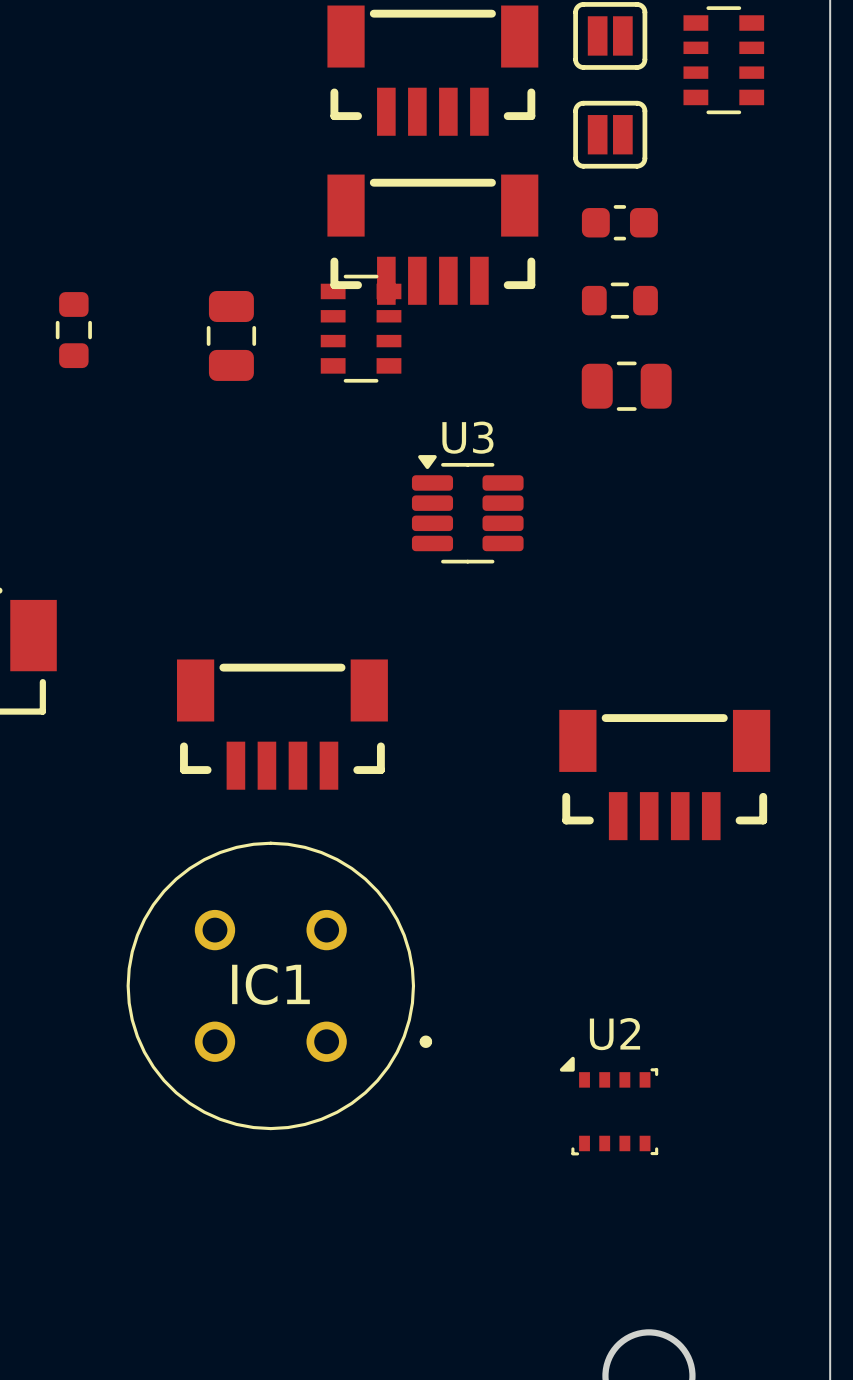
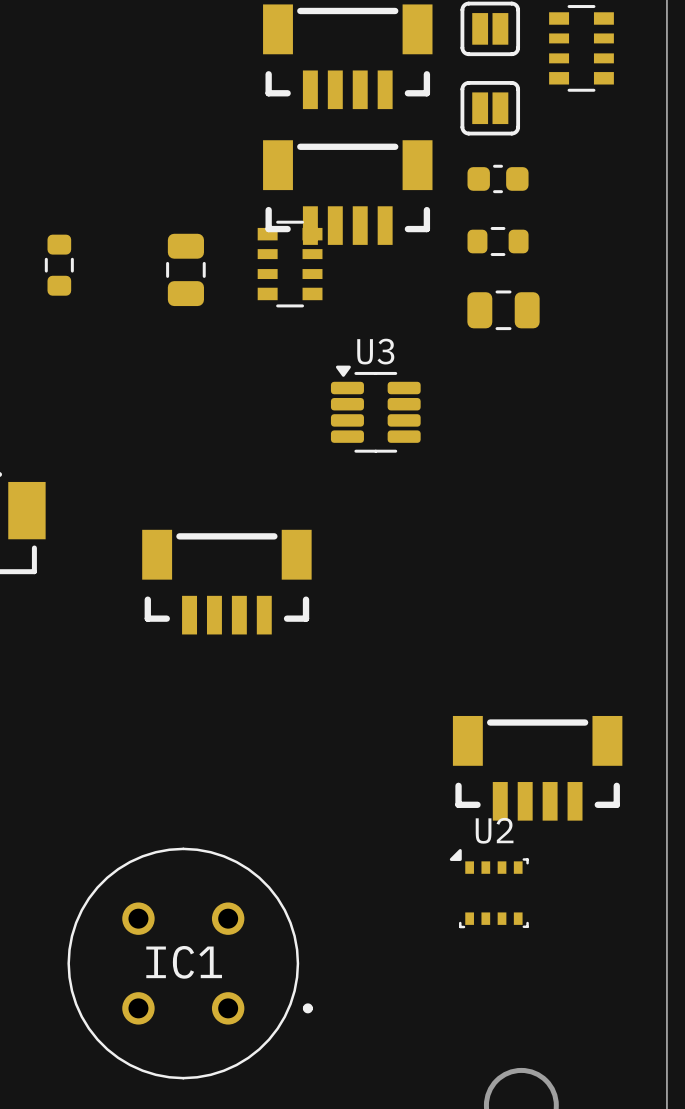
part position: (664, 775) -> (537, 768)
IC1 position: (279, 985) -> (190, 963)

